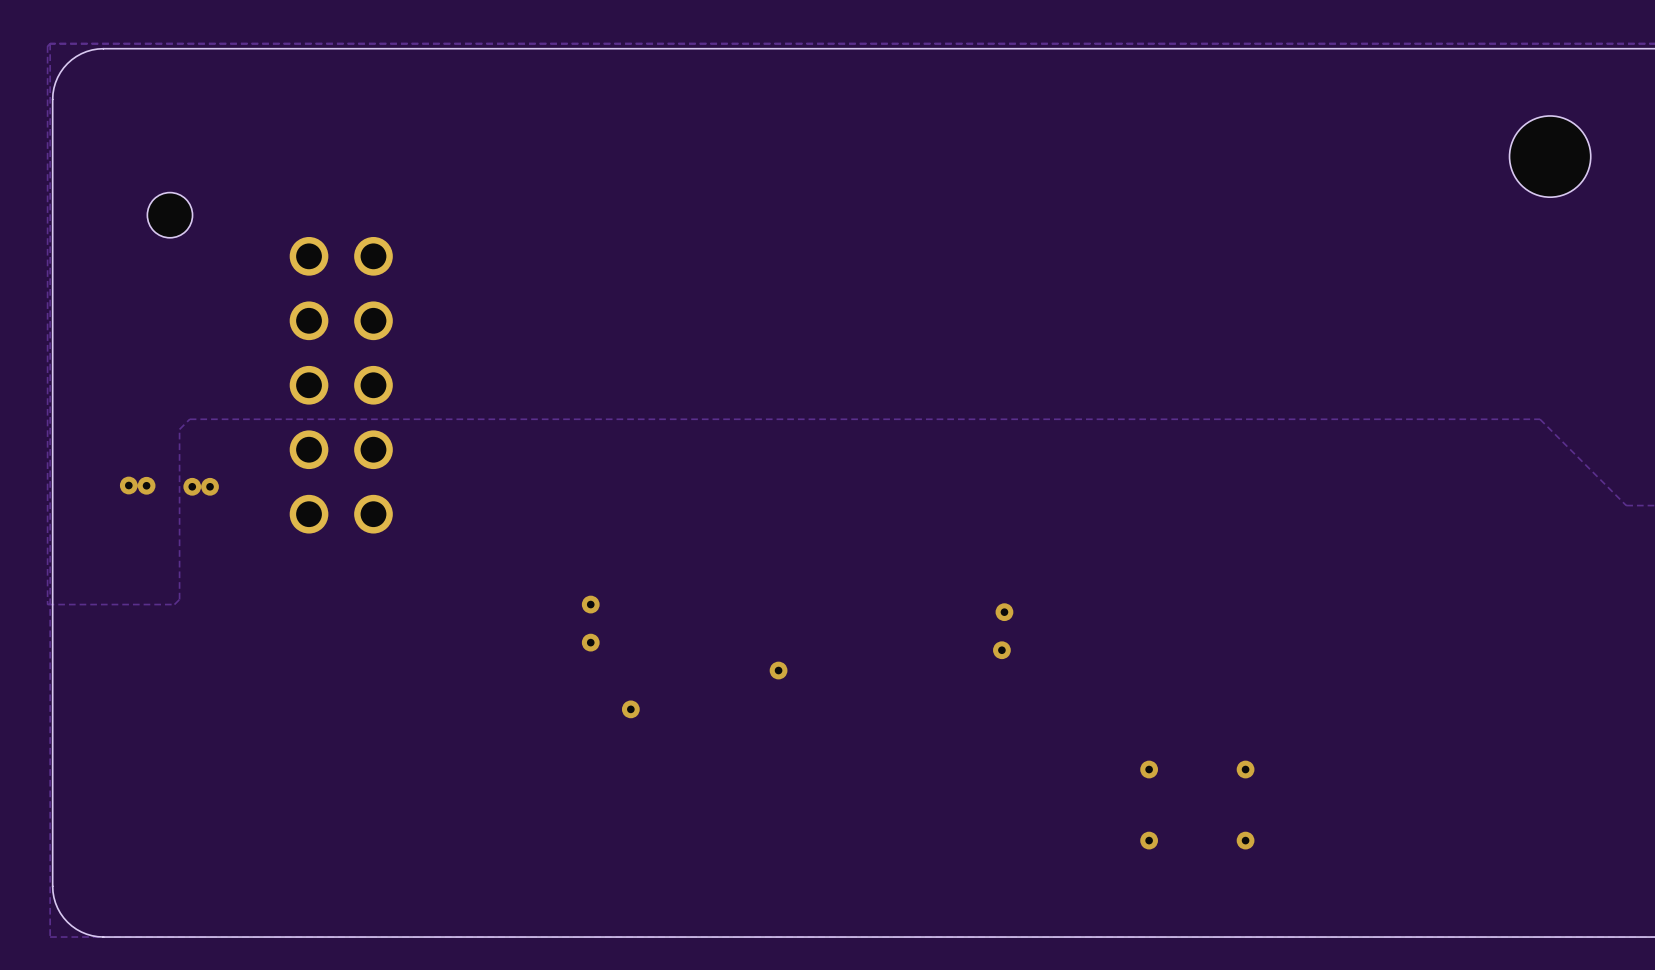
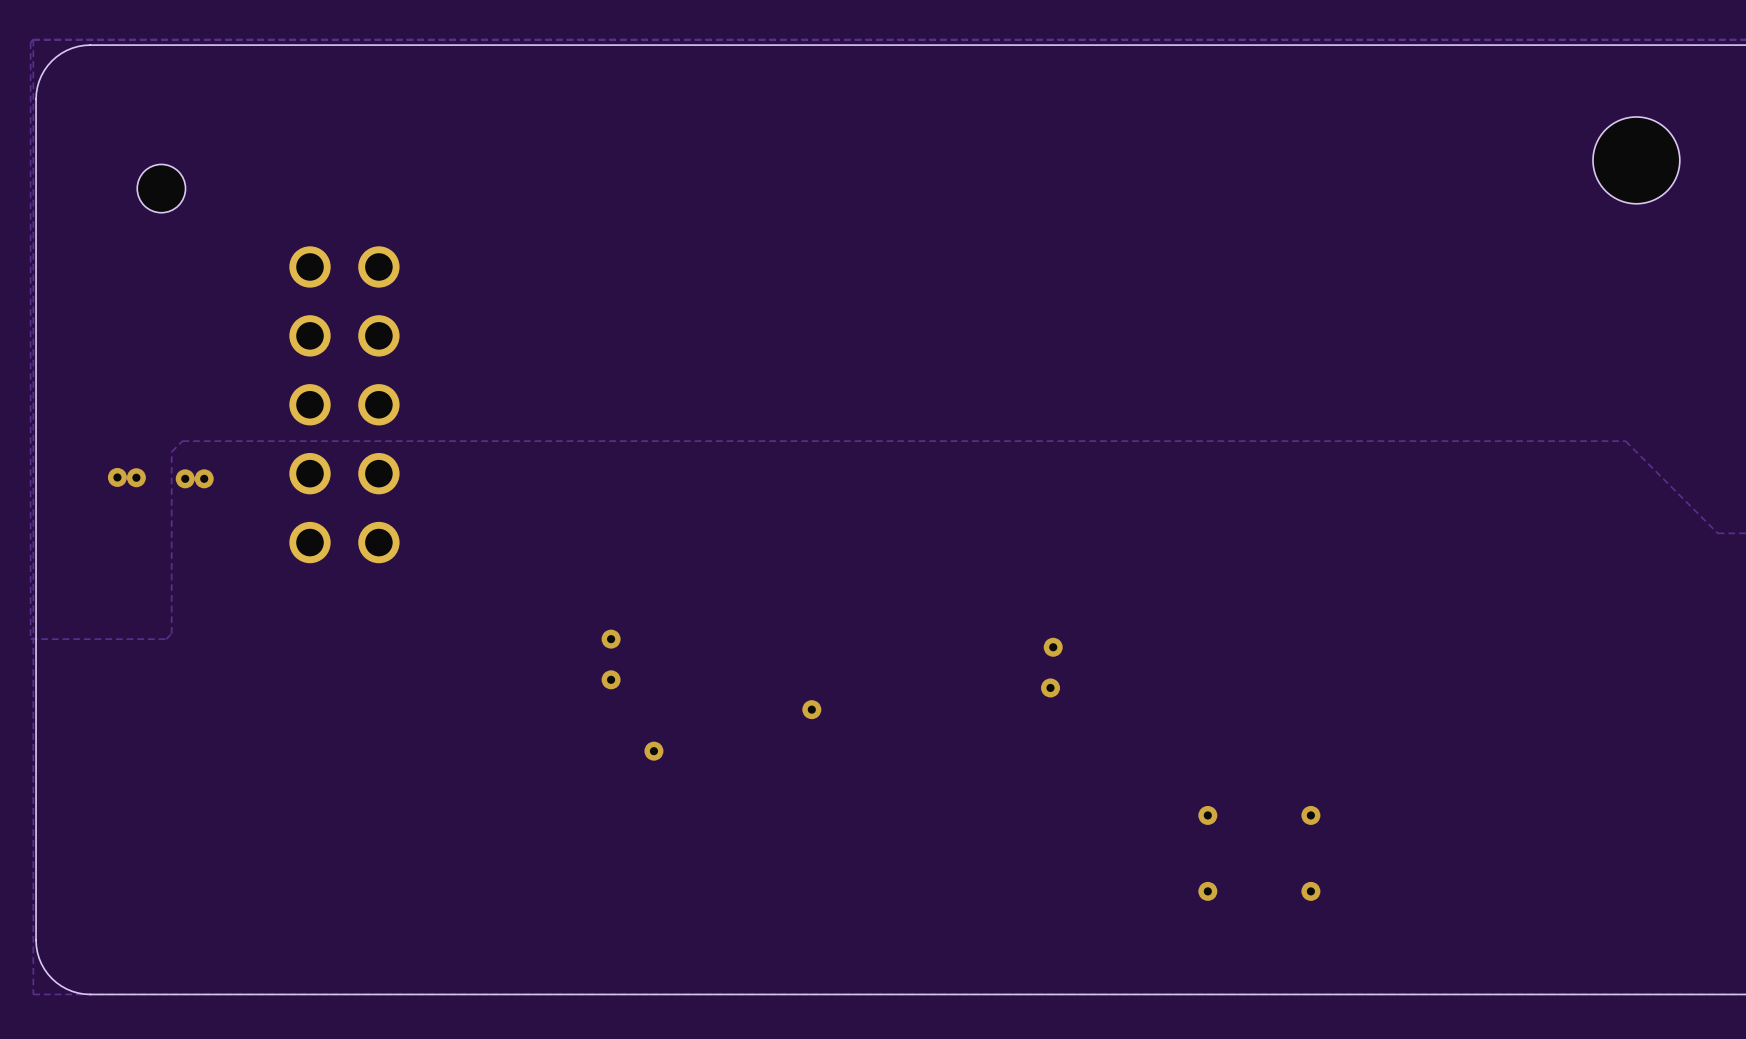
part position: (169, 215) -> (161, 188)
via: none -> (117, 477)
via: none -> (136, 477)
via: none -> (185, 478)
via: none -> (204, 478)
via: (128, 485) -> none
via: (146, 485) -> none
via: (192, 486) -> none
via: (210, 486) -> none

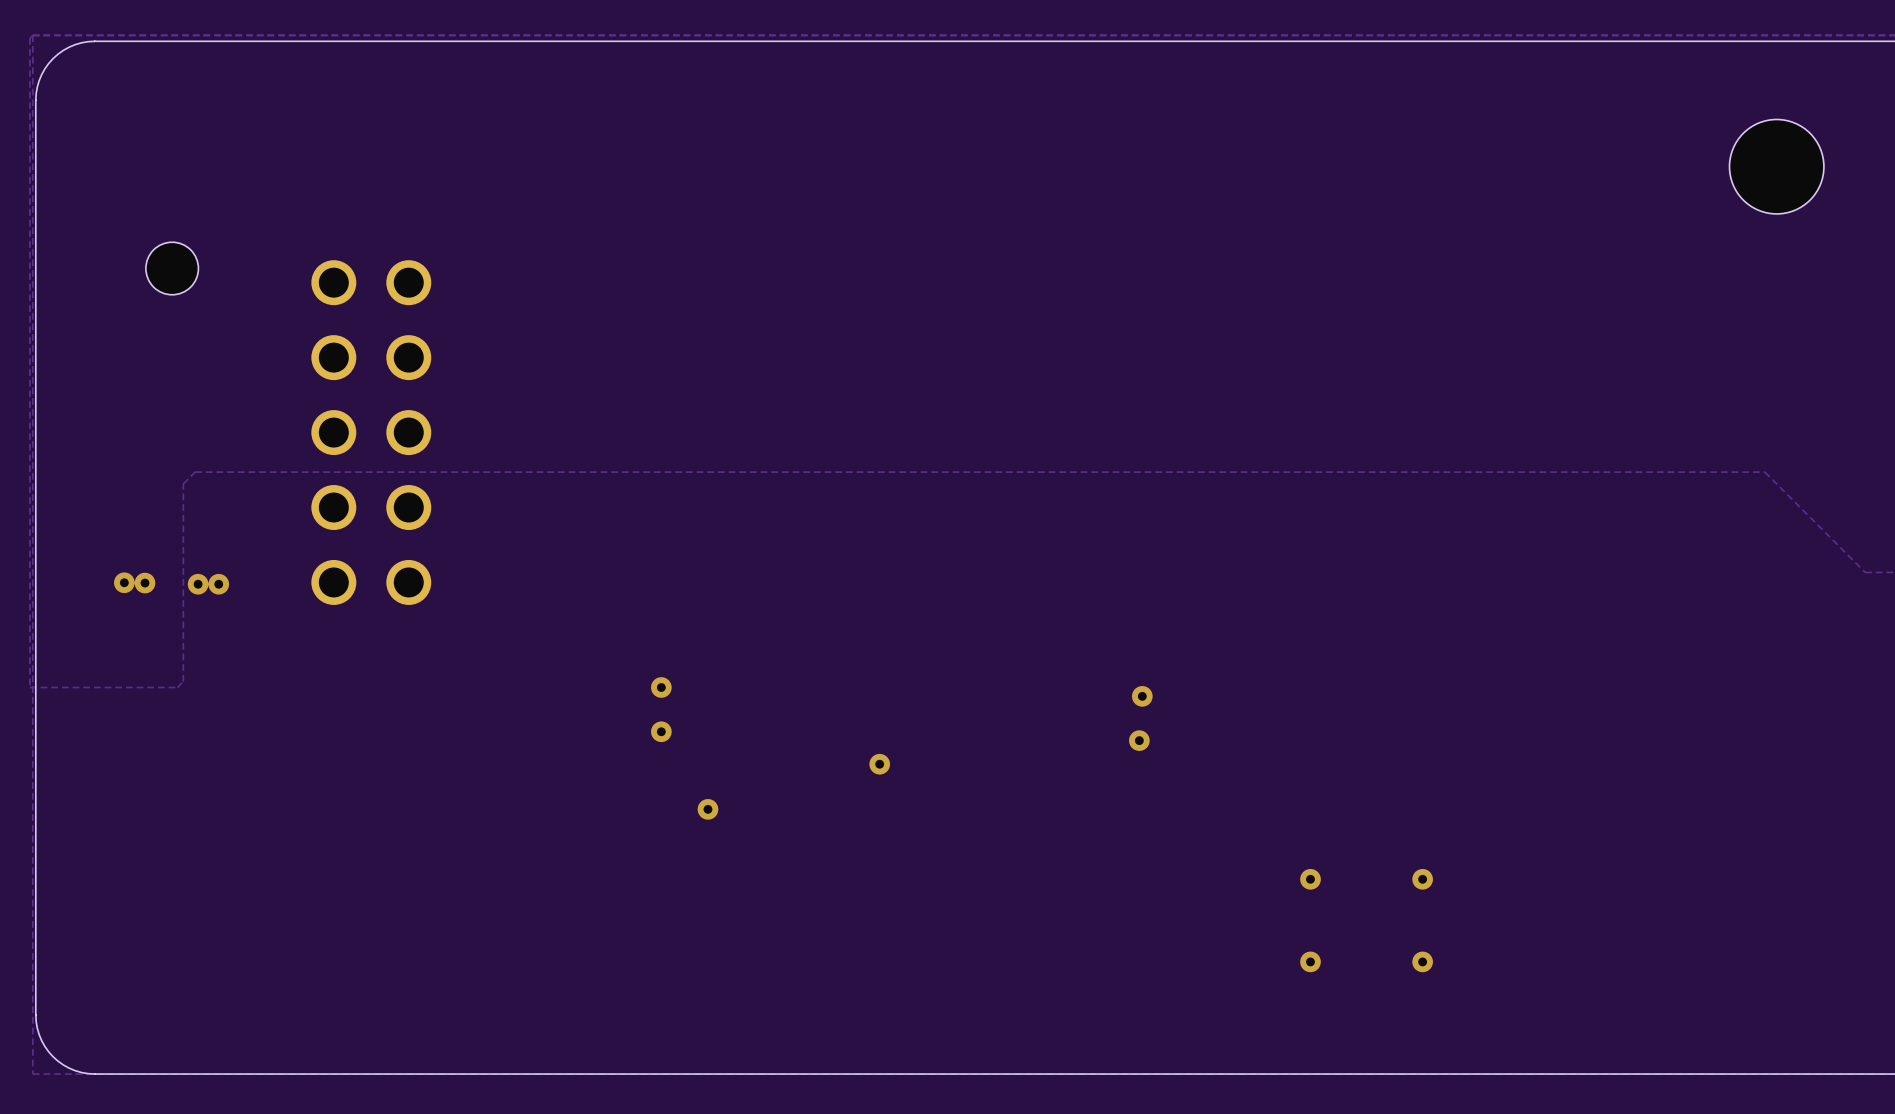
part position: (161, 188) -> (172, 268)
via: (117, 477) -> none
via: (136, 477) -> none
via: (185, 478) -> none
via: (204, 478) -> none
via: none -> (124, 582)
via: none -> (144, 583)
via: none -> (198, 584)
via: none -> (218, 584)

